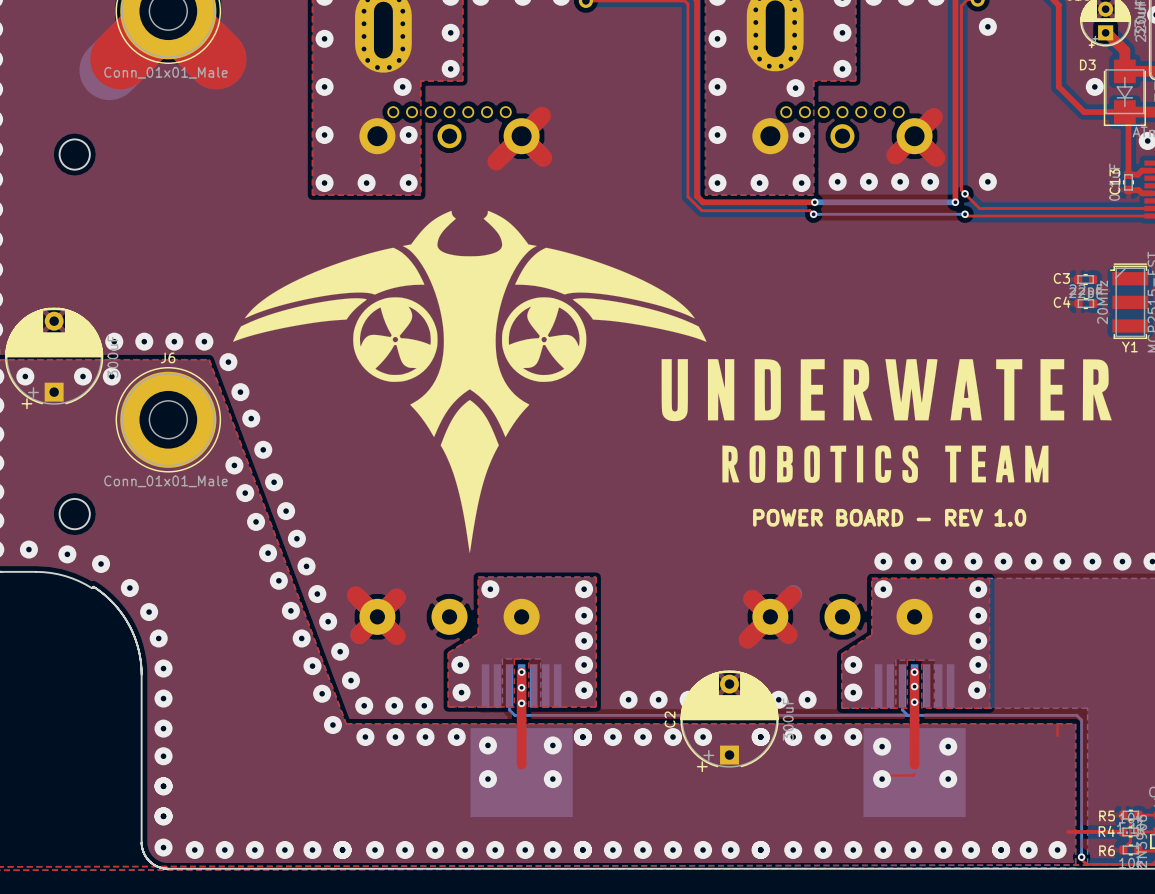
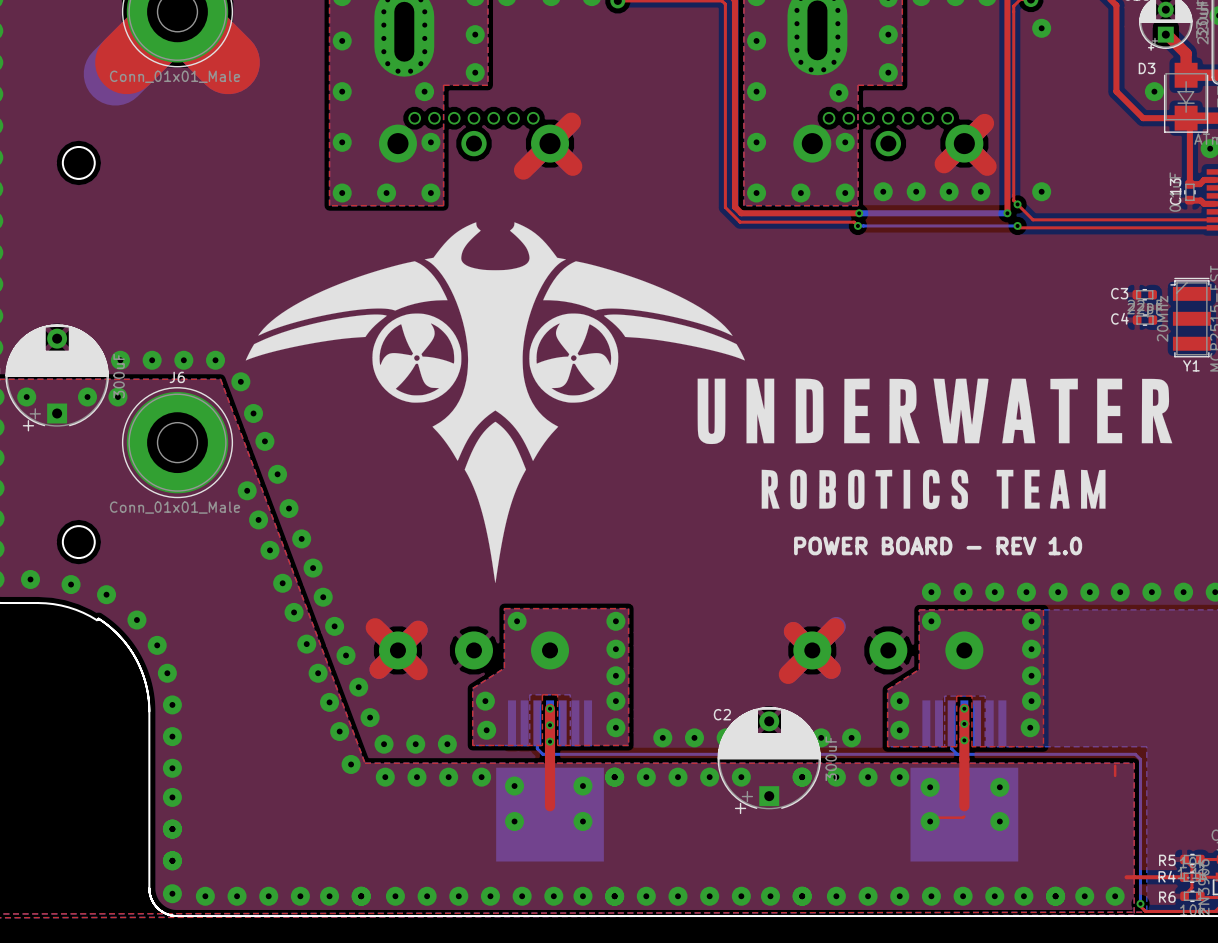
C2 name rotation: 0° (670, 719) -> 90° clockwise (722, 714)
C2 name position: C2 (670, 719) -> C2 (722, 714)

